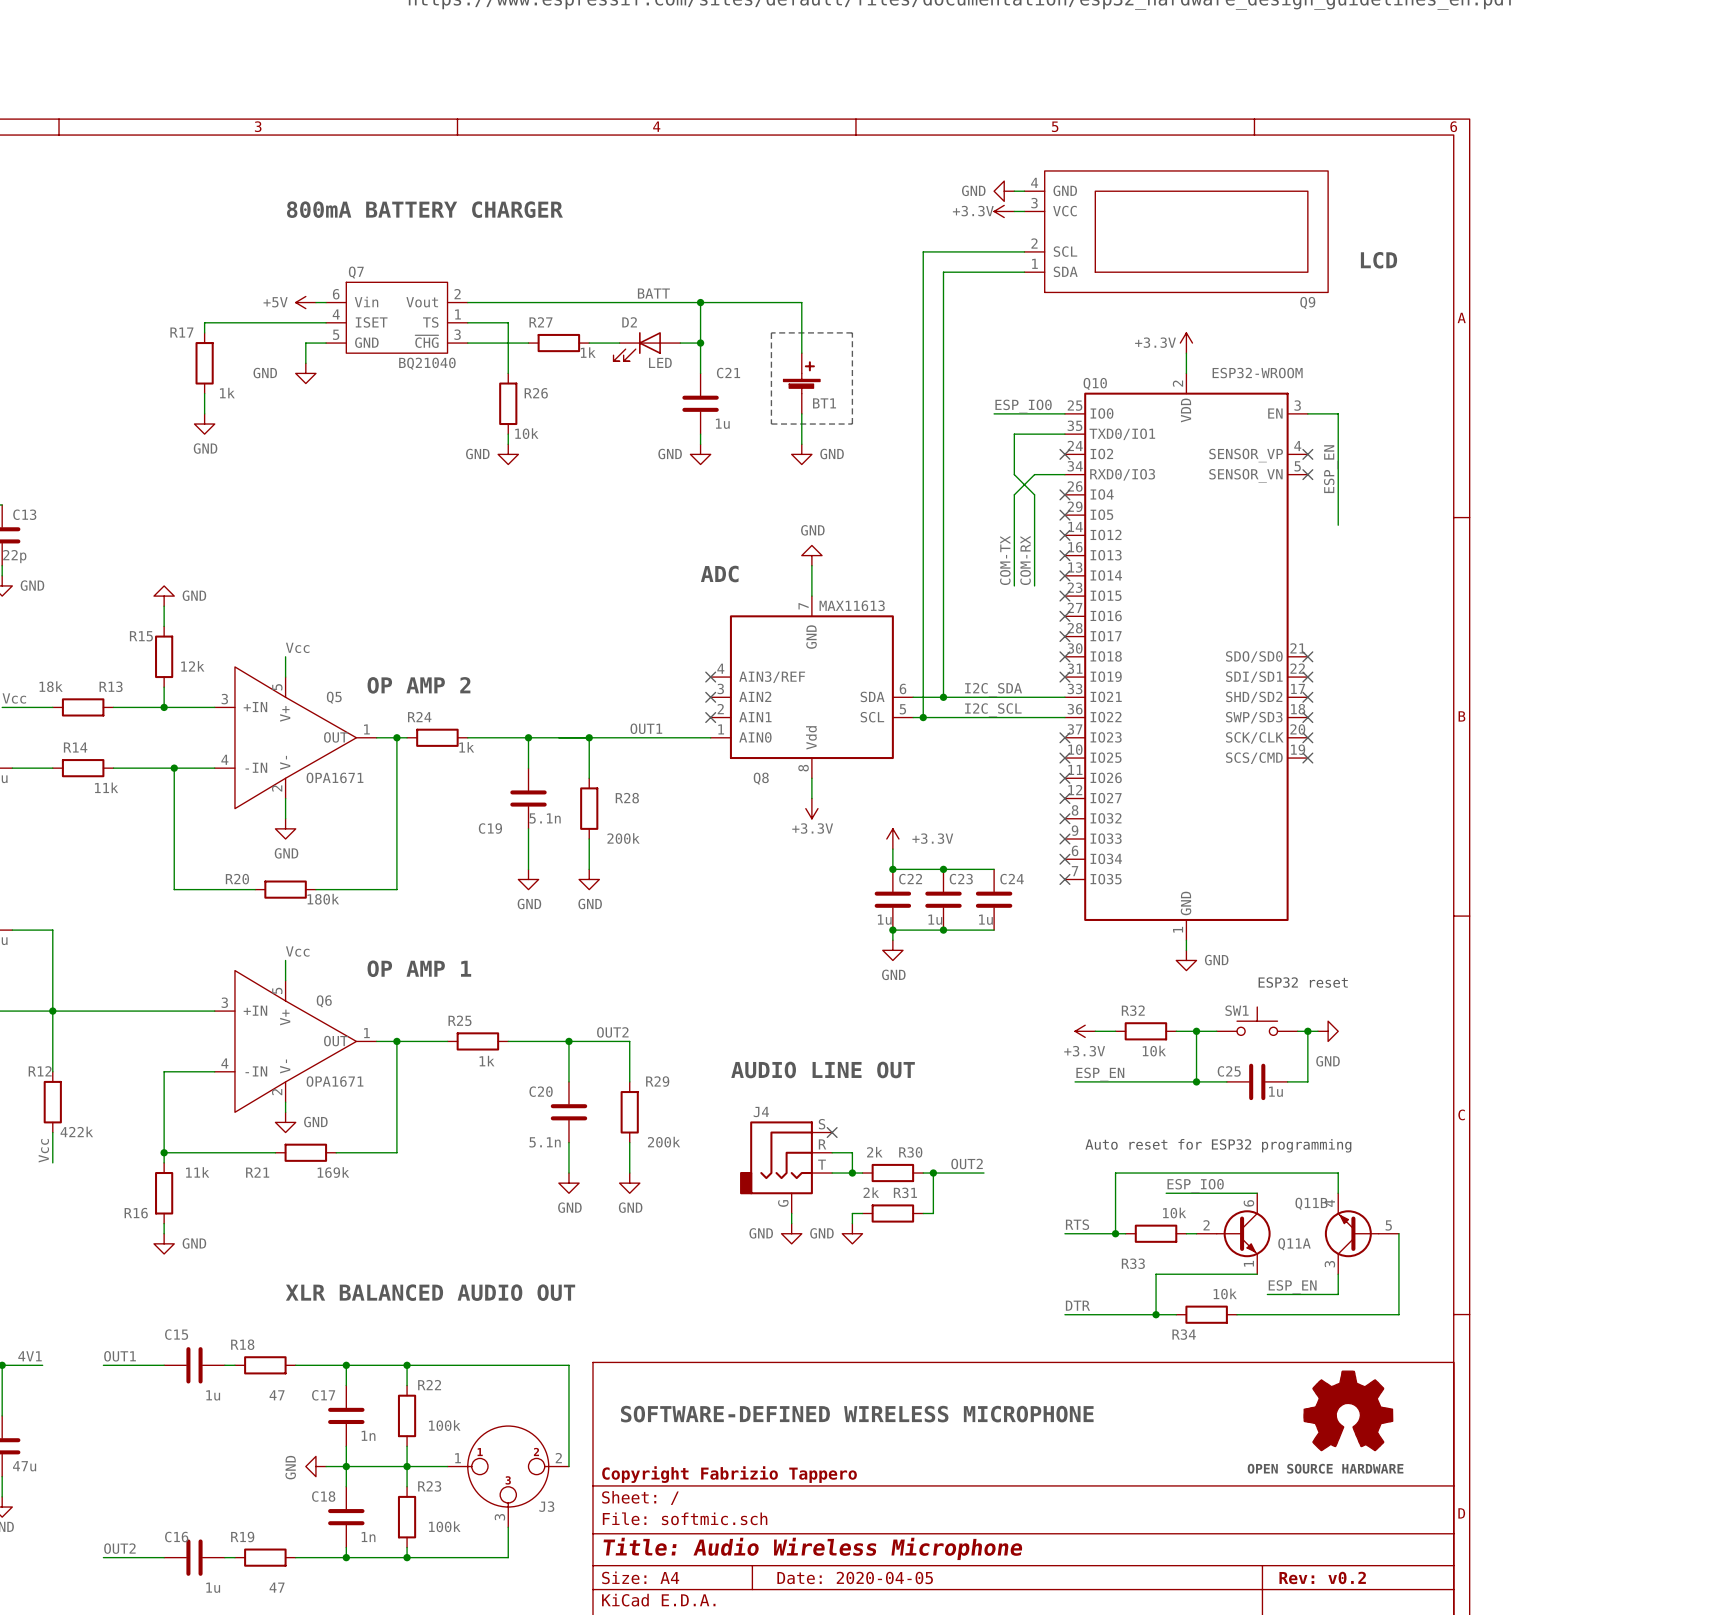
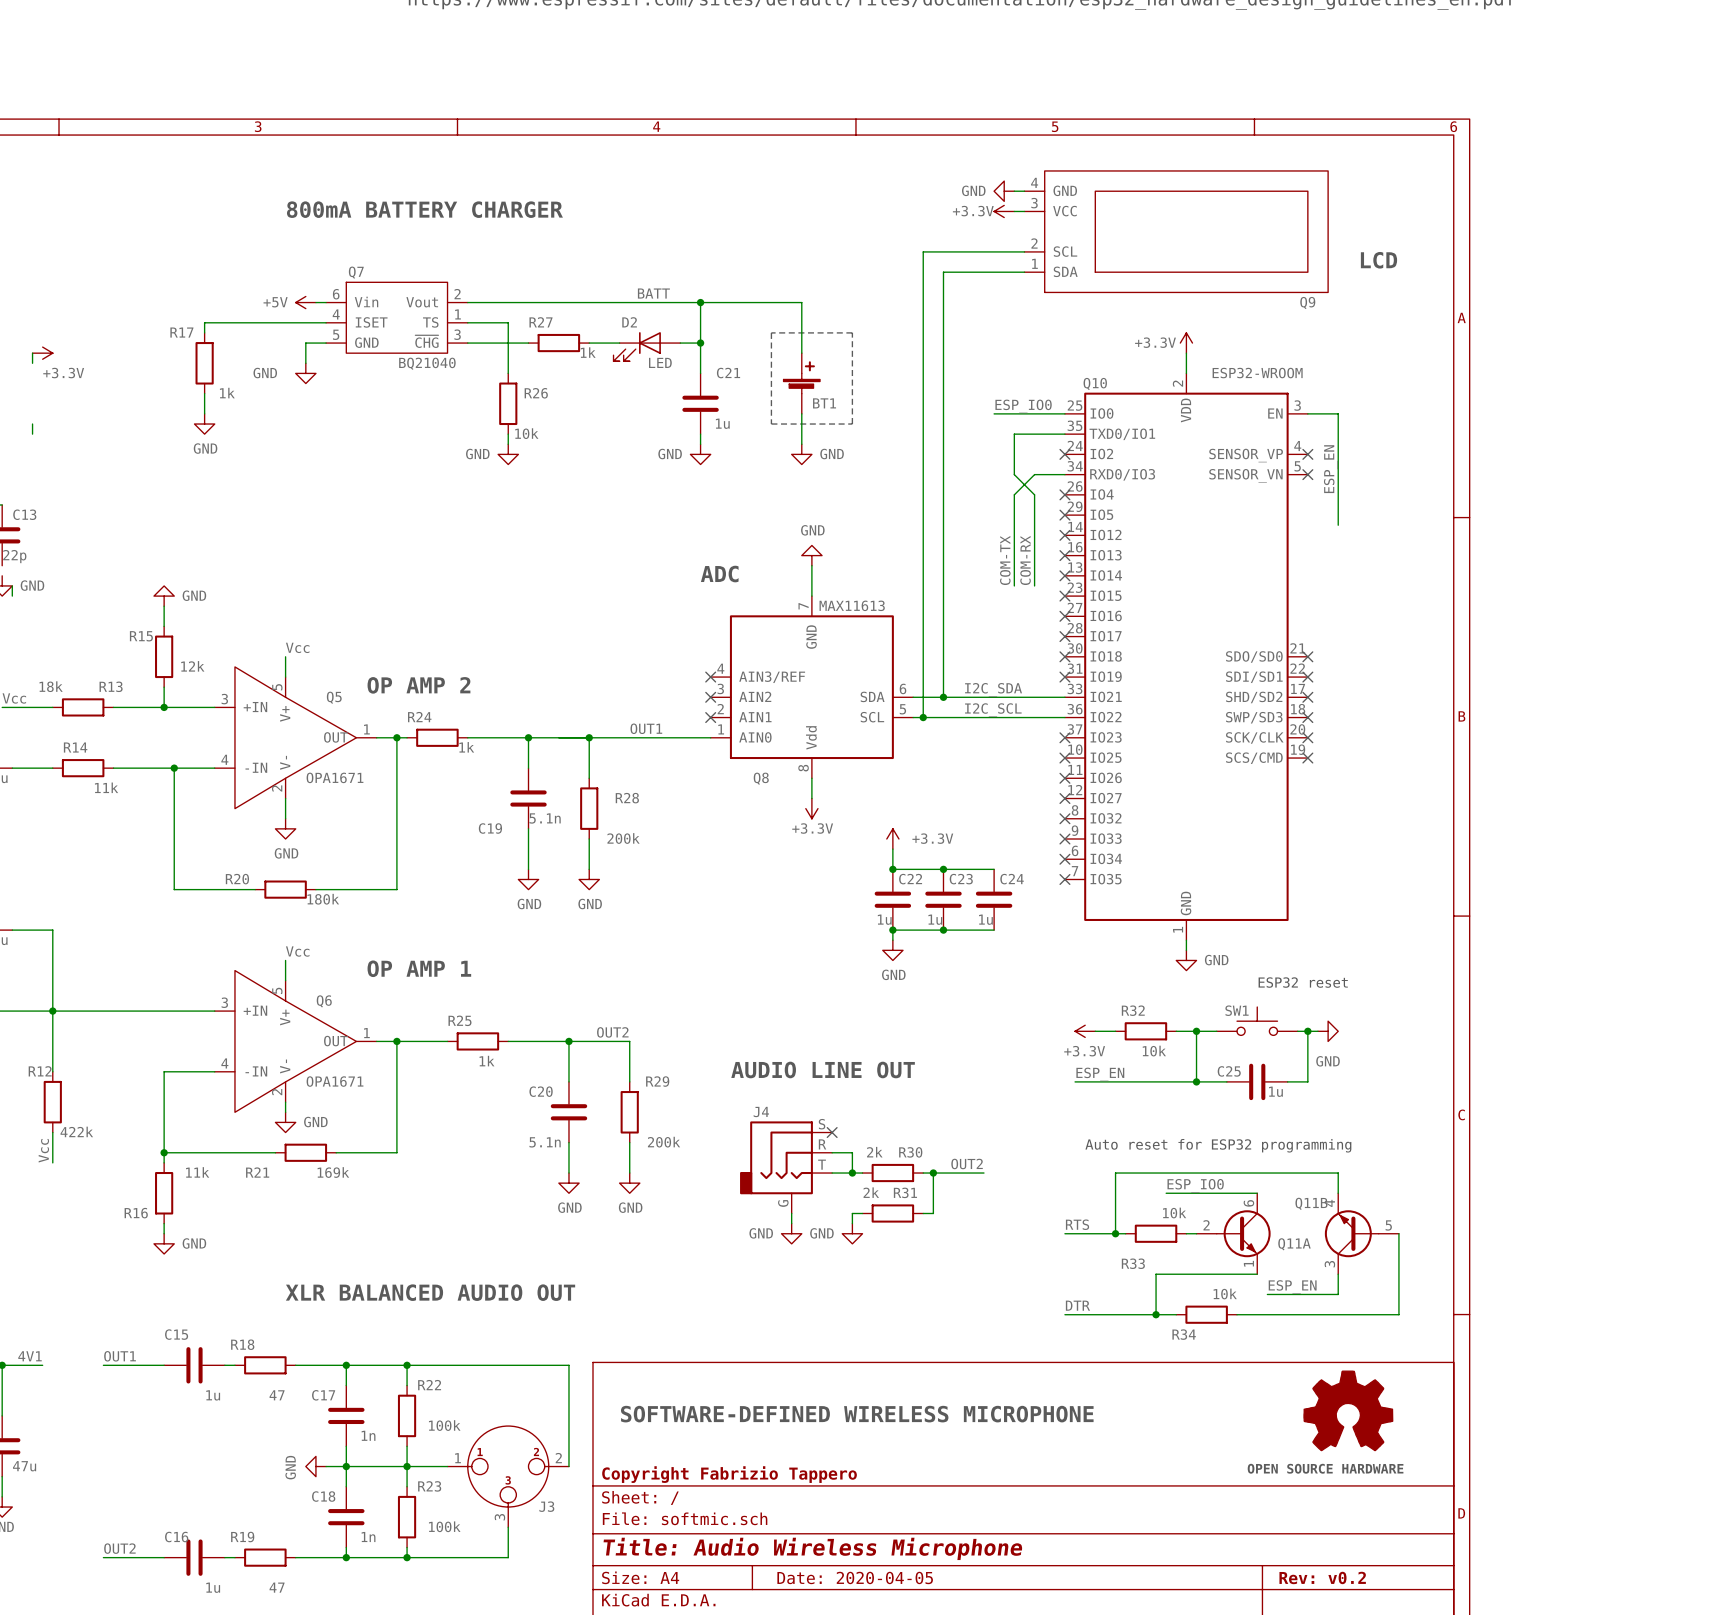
wire: none -> (32, 353) (32, 363)
power symbol: none -> +3.3V (42, 353)
wire: none -> (32, 424) (32, 434)
wire: (2, 565) (2, 575) -> (12, 585) (12, 596)

